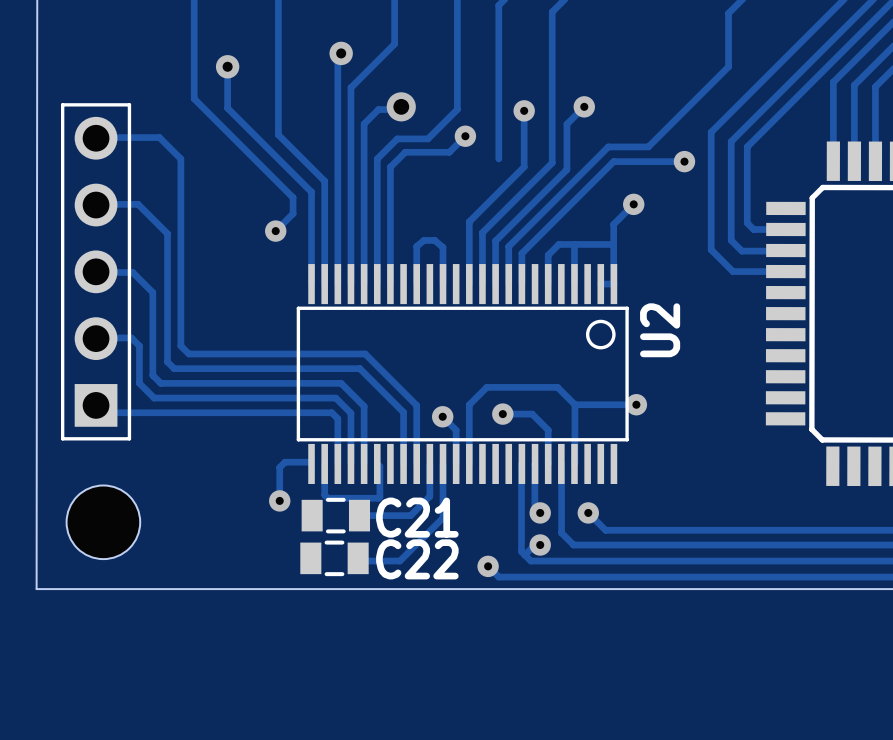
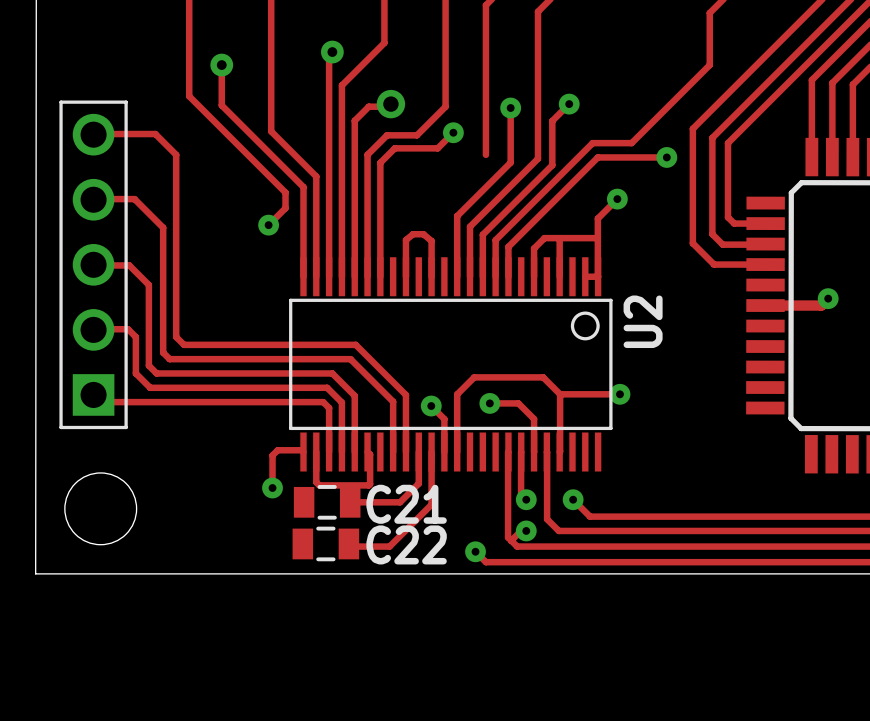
track: none -> (828, 298) (821, 305) (765, 305)
via: none -> (828, 298)

